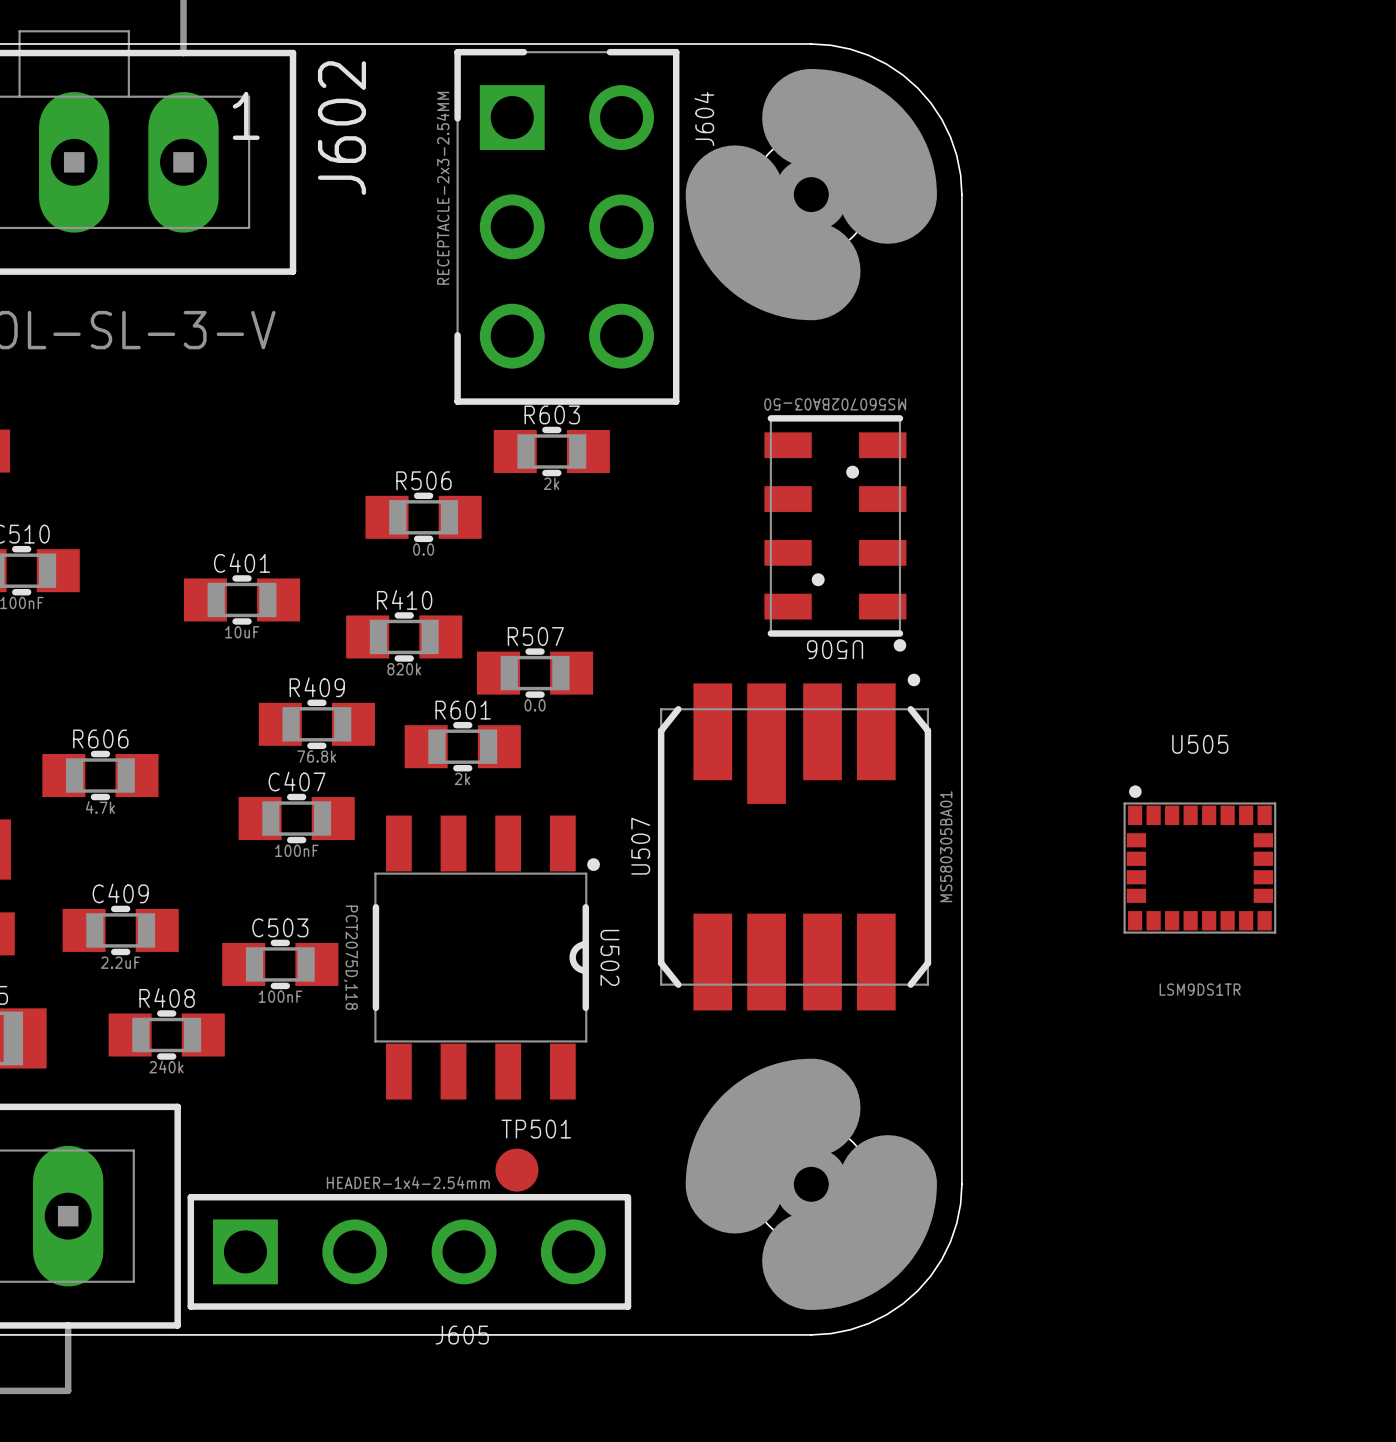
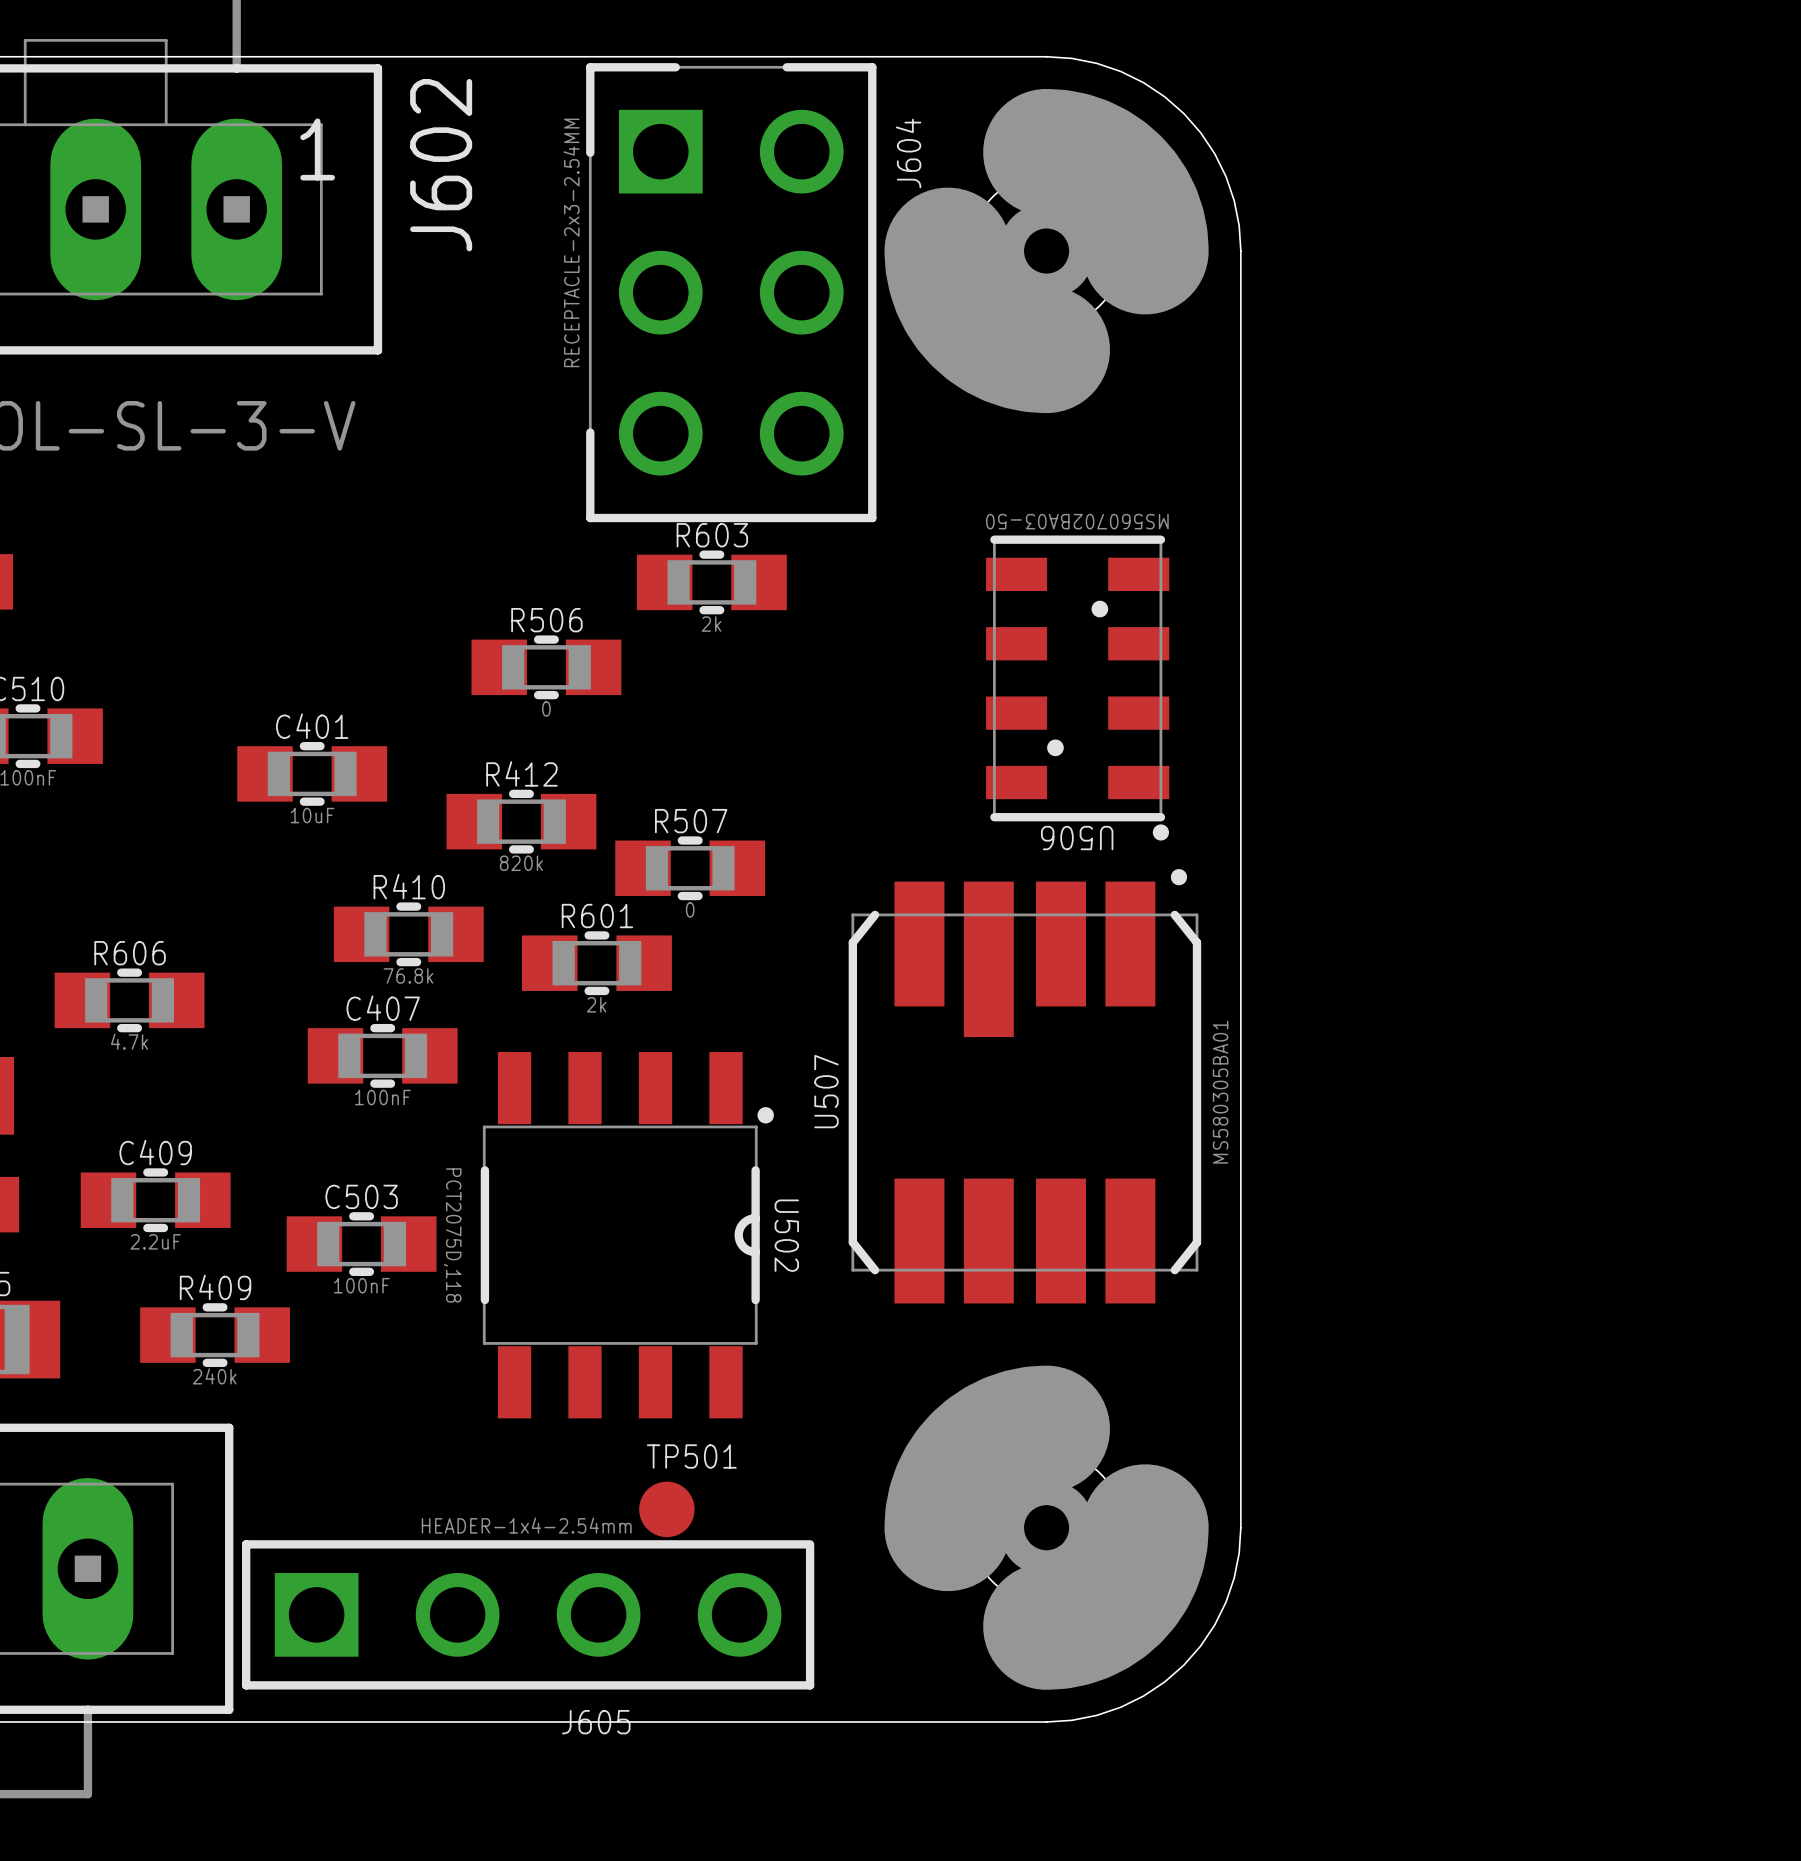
R506 value: 0.0 (423, 549) -> 0 (546, 708)
R410 name: R410 (404, 599) -> R412 (521, 773)
R409 name: R409 (317, 687) -> R410 (409, 886)
R507 value: 0.0 (535, 705) -> 0 (690, 909)
U505: LSM9DS1TR (1199, 859) -> none
R408 name: R408 (167, 998) -> R409 (215, 1287)

